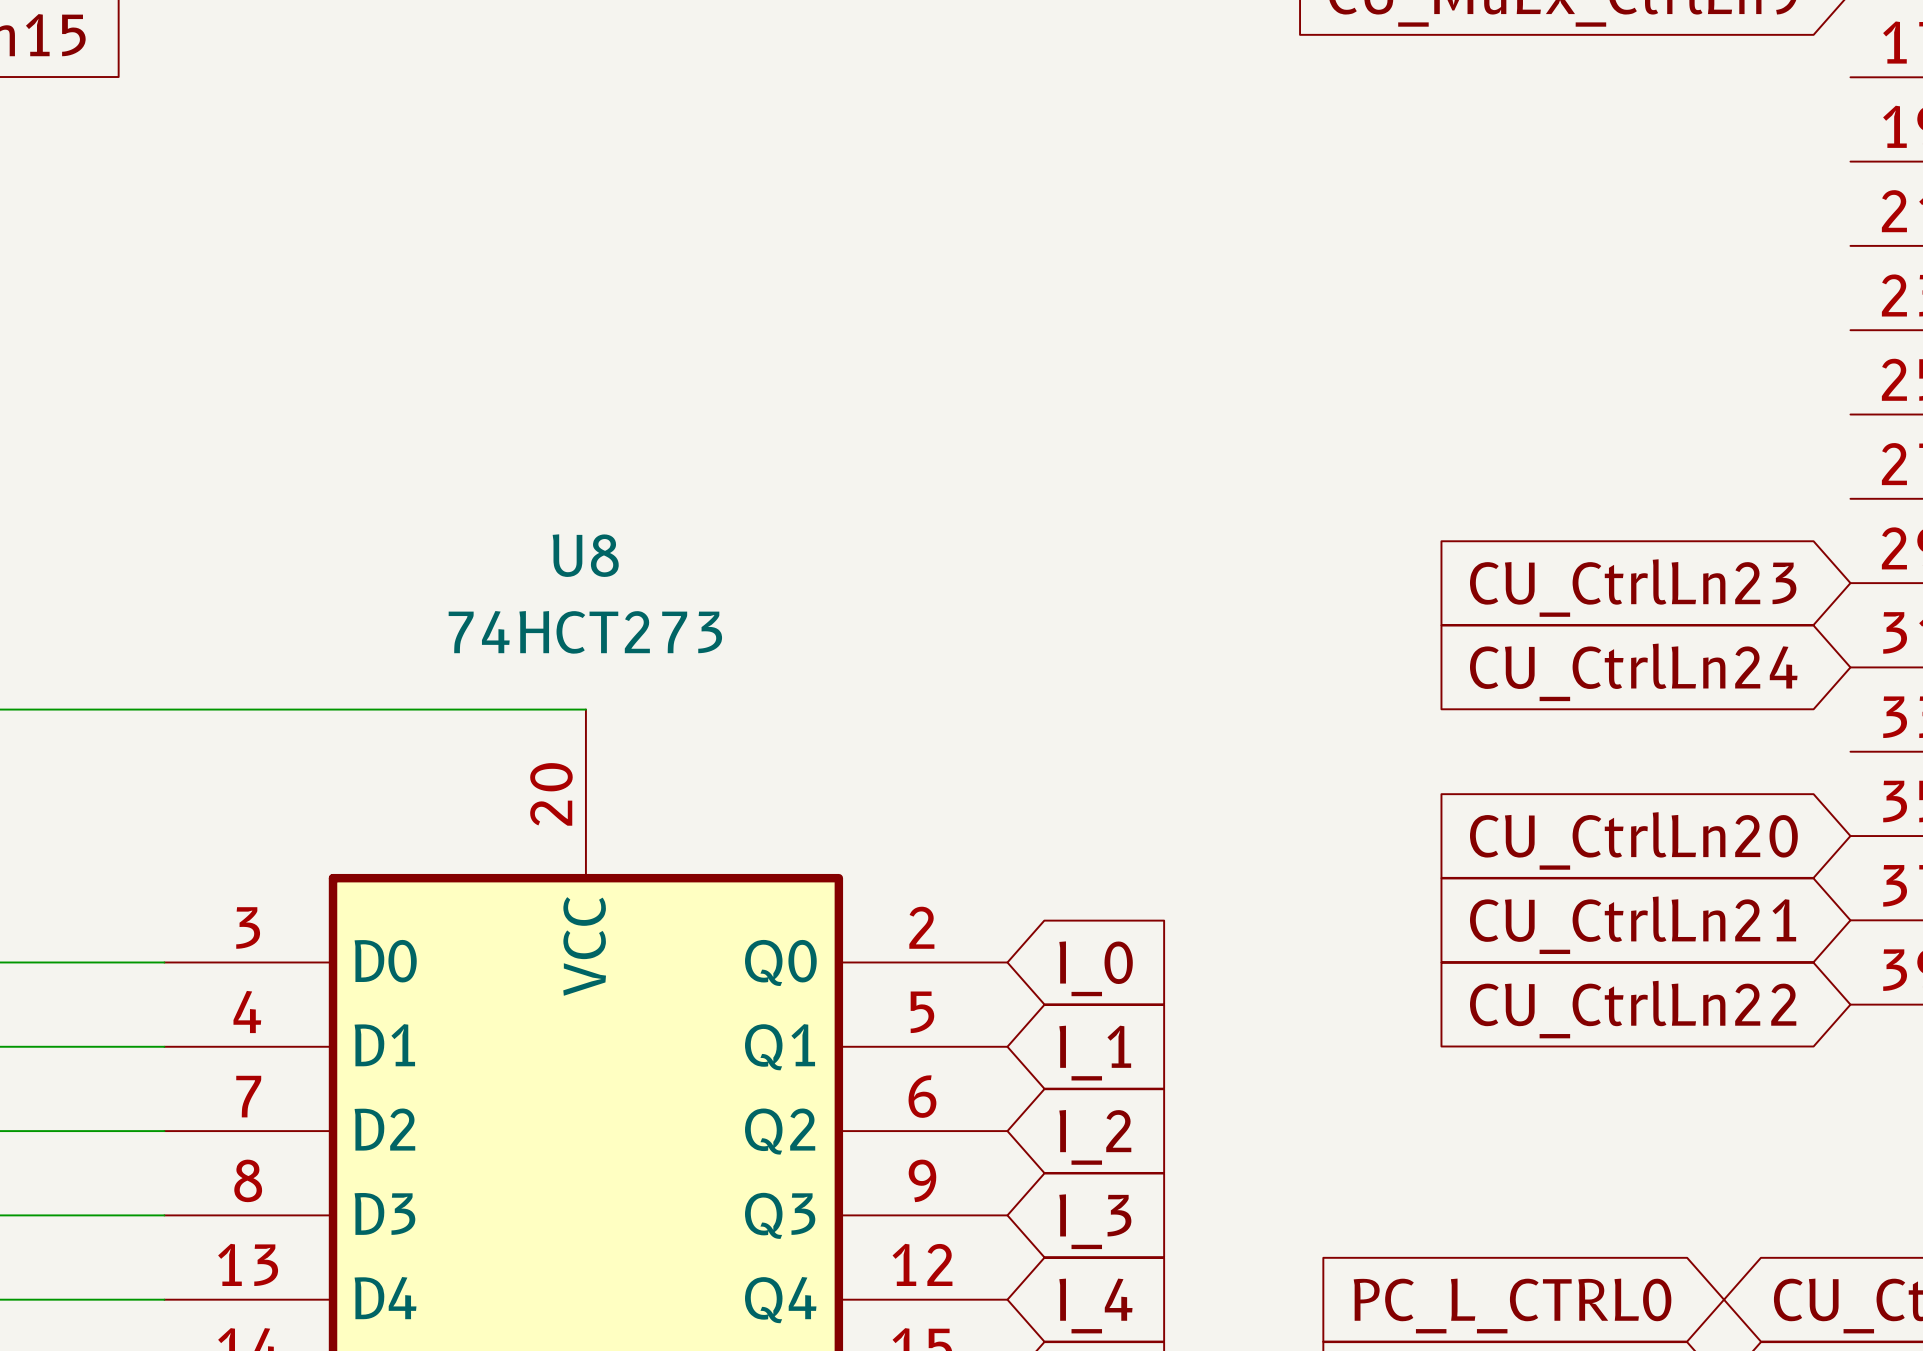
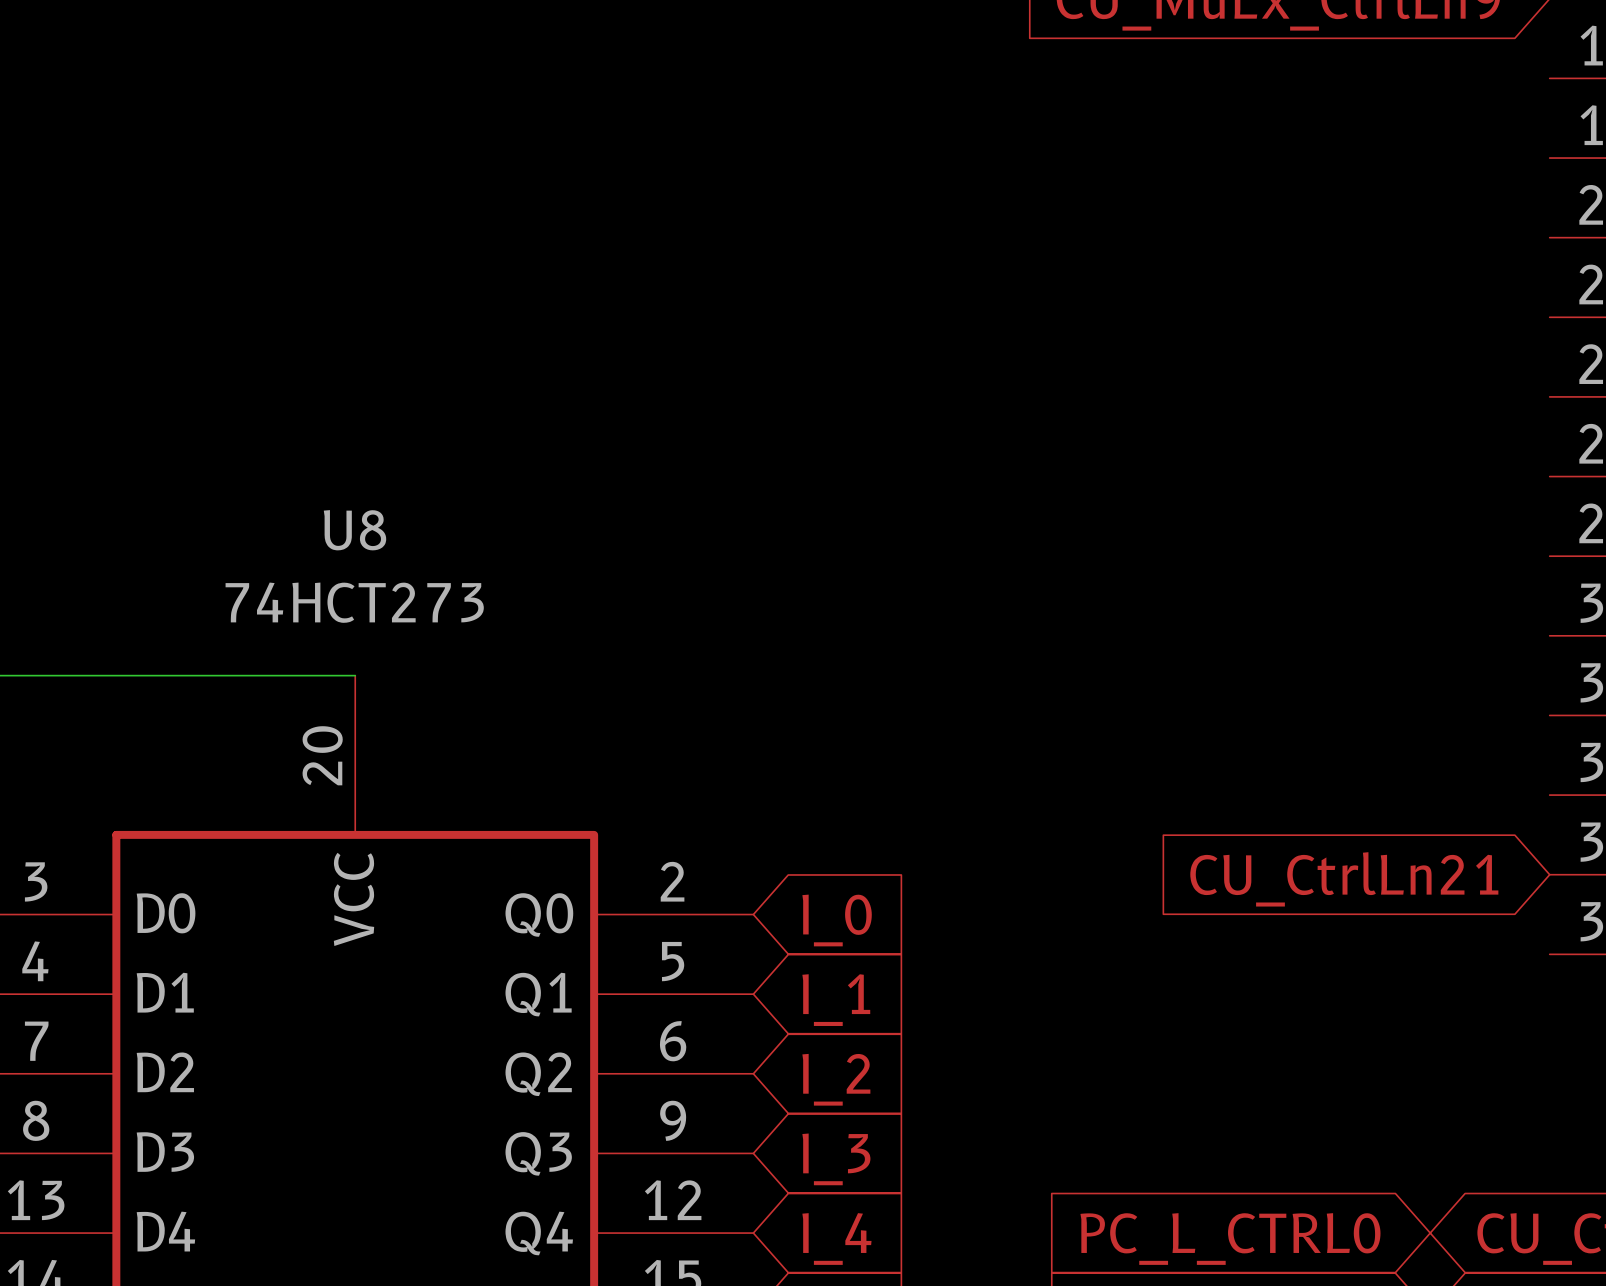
global label: CU_CtrlLn23 (1633, 588) -> none
global label: CU_CtrlLn24 (1633, 672) -> none
global label: CU_CtrlLn20 (1633, 840) -> none
global label: CU_CtrlLn22 (1633, 1009) -> none

